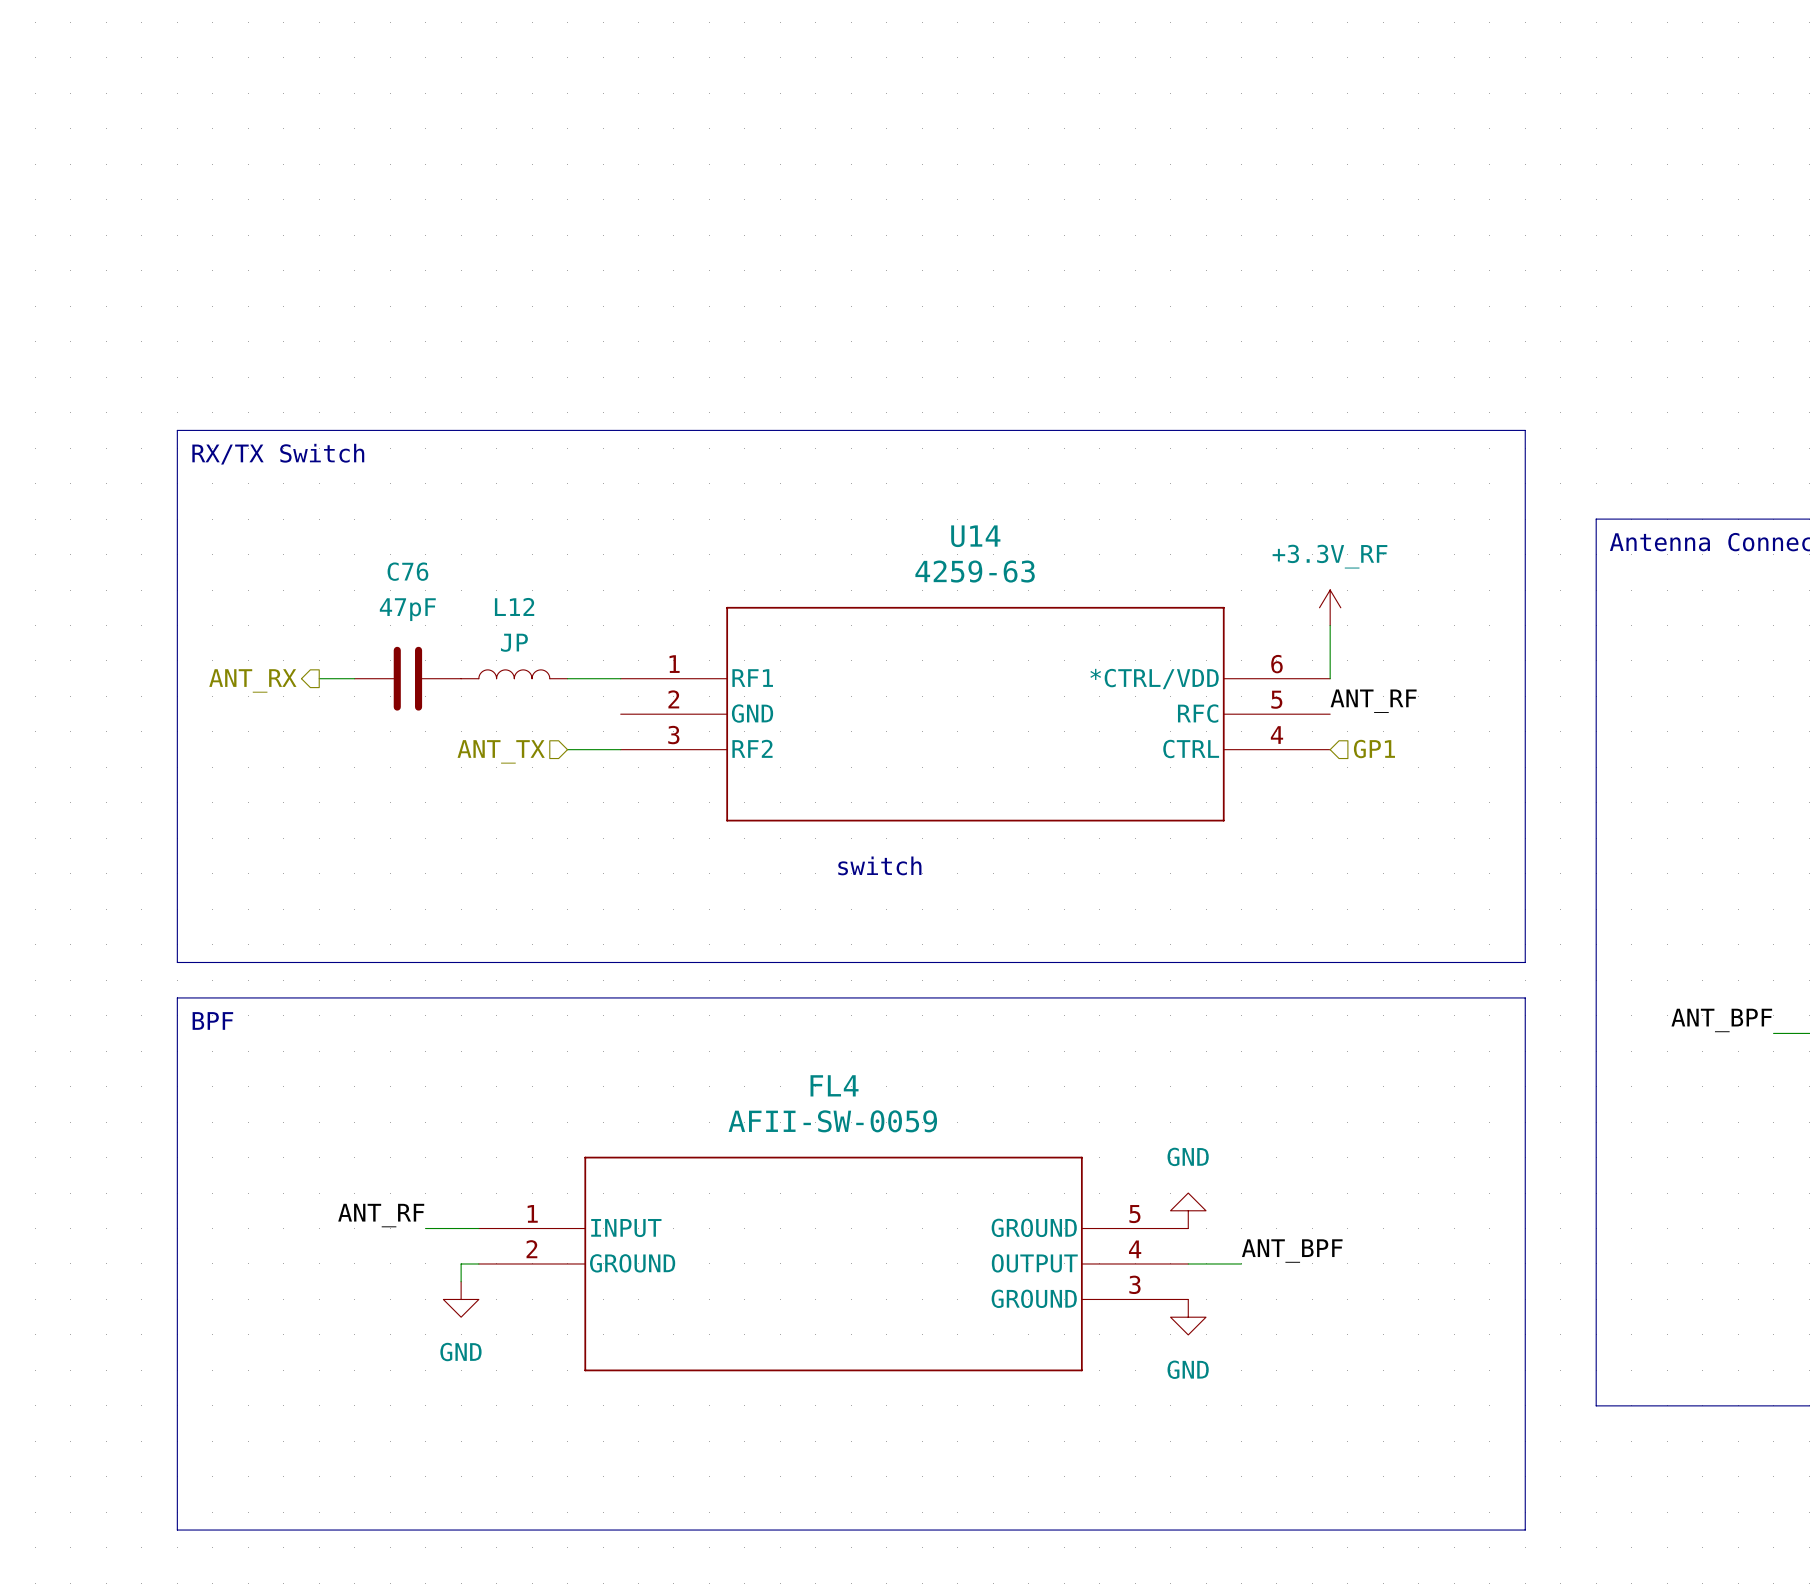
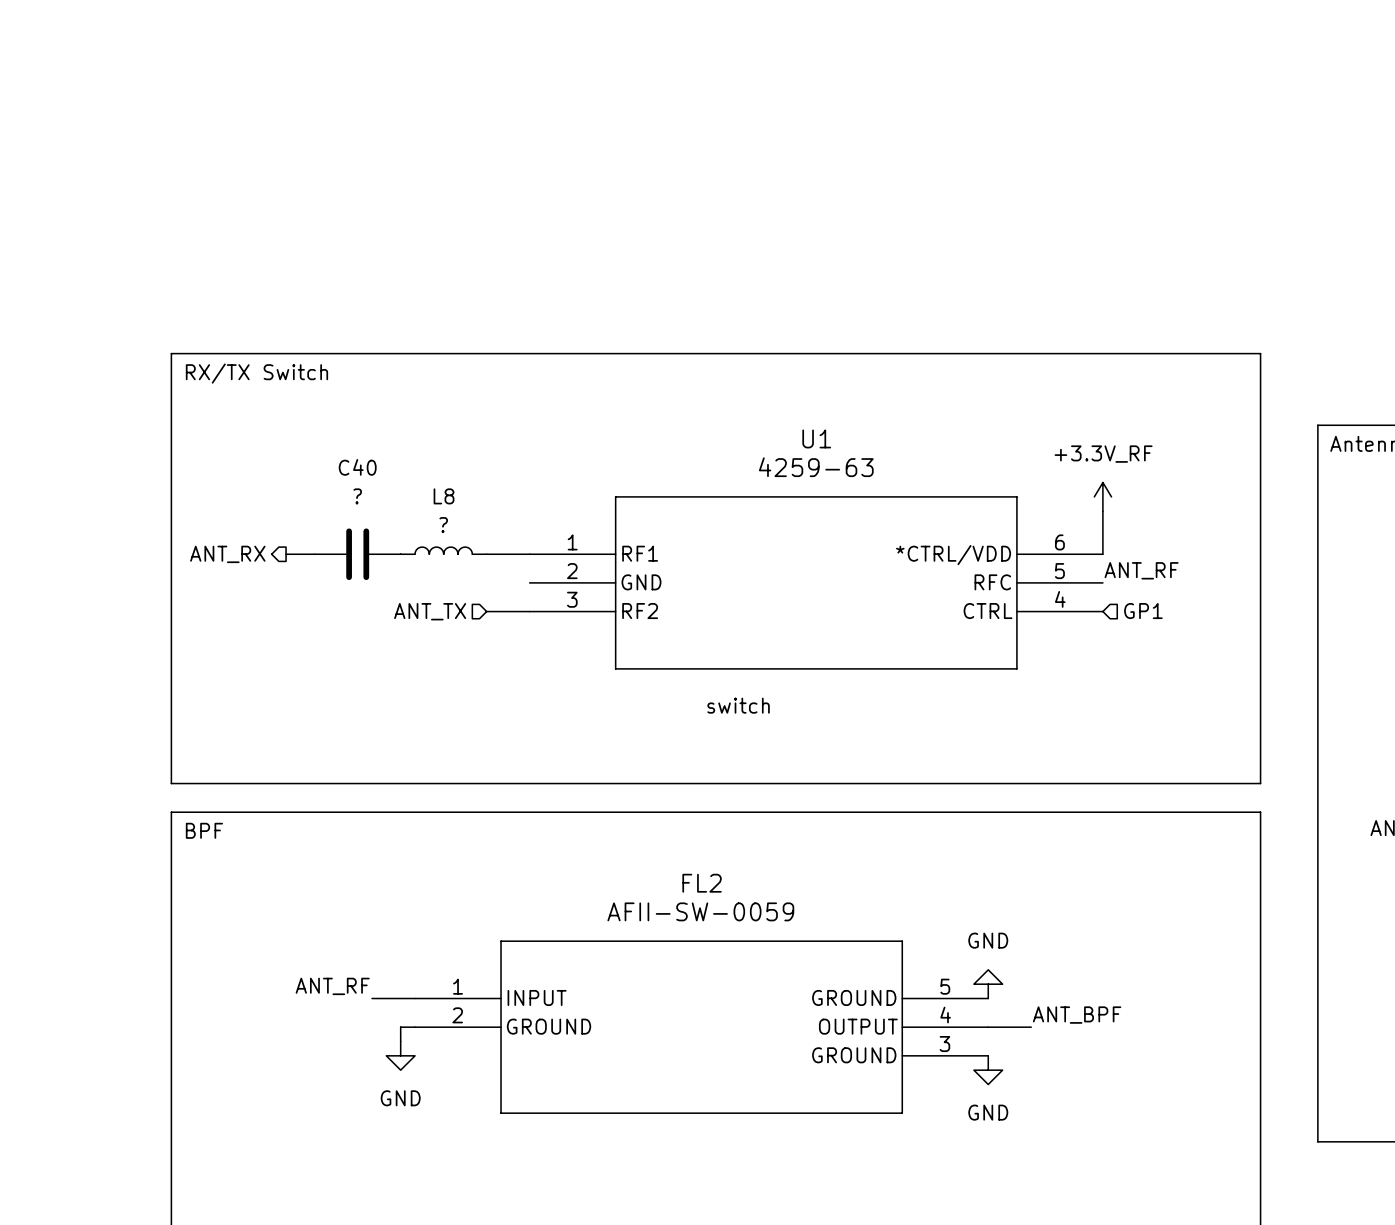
U14 name: U14 (975, 536) -> U1 (816, 438)
C76 name: C76 (407, 571) -> C40 (357, 467)
L12 name: L12 (514, 606) -> L8 (444, 496)
C76 value: 47pF (407, 609) -> ? (357, 496)
L12 value: JP (514, 642) -> ? (443, 525)
FL4 name: FL4 (834, 1085) -> FL2 (702, 883)

